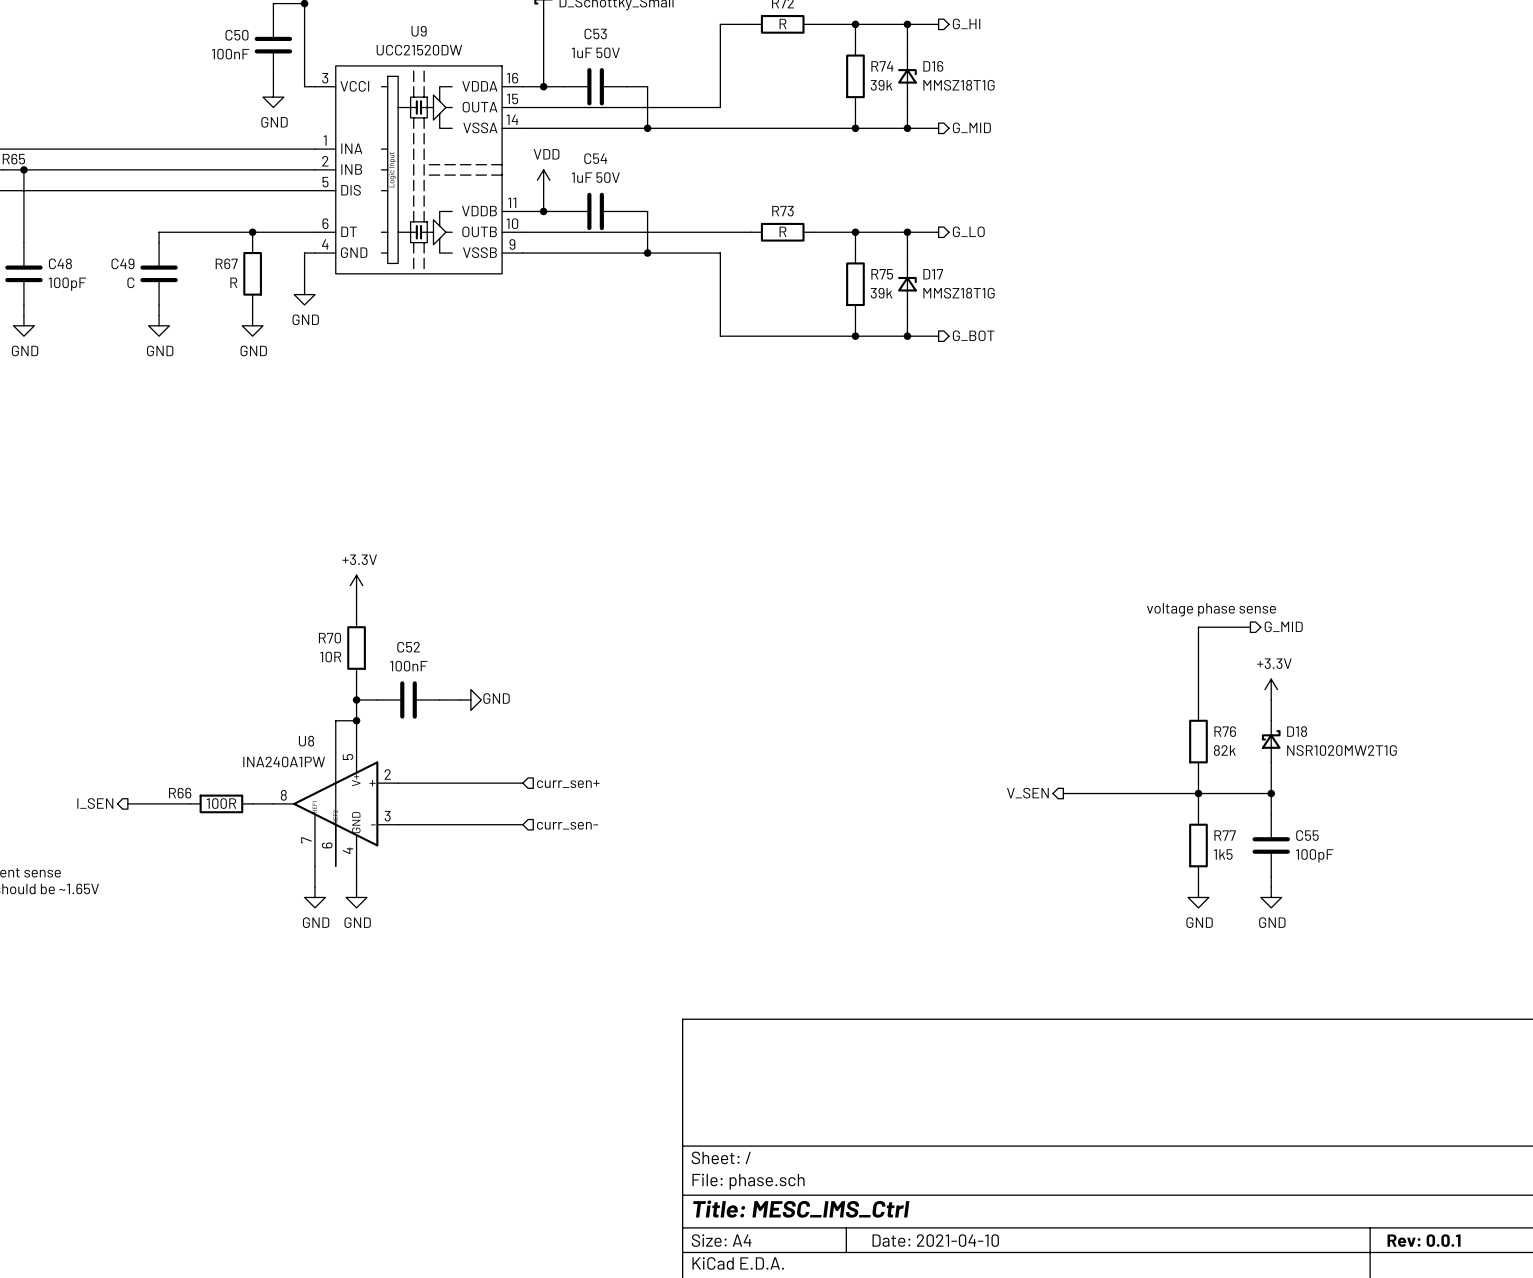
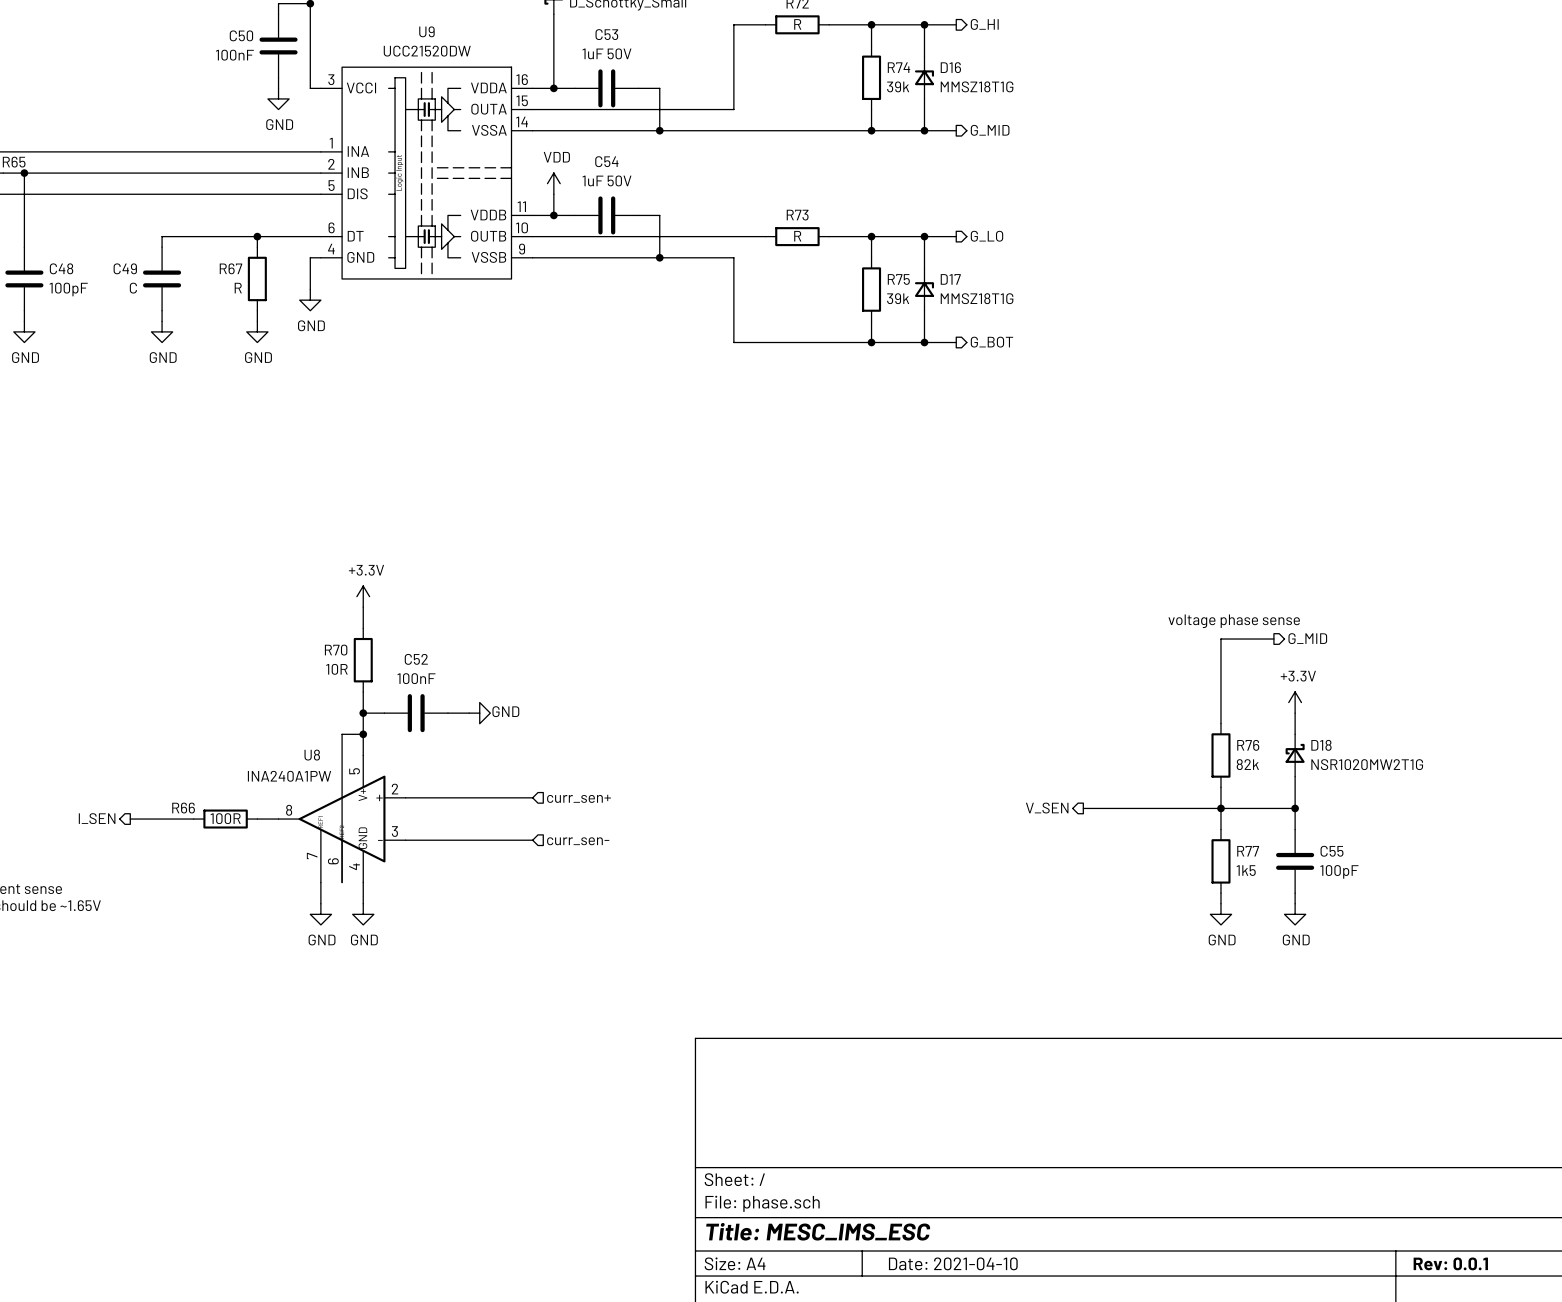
title block: Title: MESC_IMS_Ctrl (801, 1209) -> Title: MESC_IMS_ESC (818, 1231)

